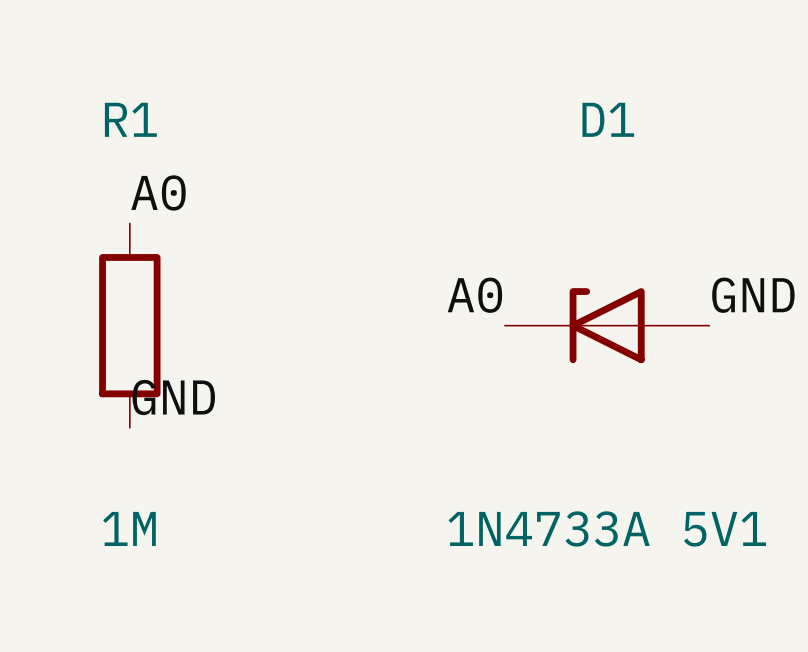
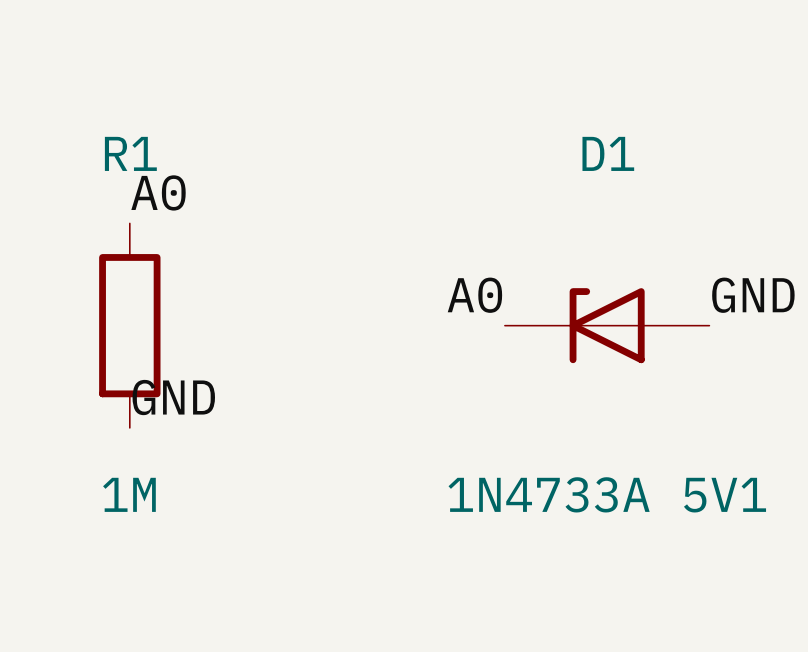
R1 name position: R1 (130, 119) -> R1 (130, 153)
D1 name position: D1 (608, 119) -> D1 (608, 153)
R1 value position: 1M (129, 528) -> 1M (129, 494)
D1 value position: 1N4733A 5V1 (607, 528) -> 1N4733A 5V1 (607, 494)

